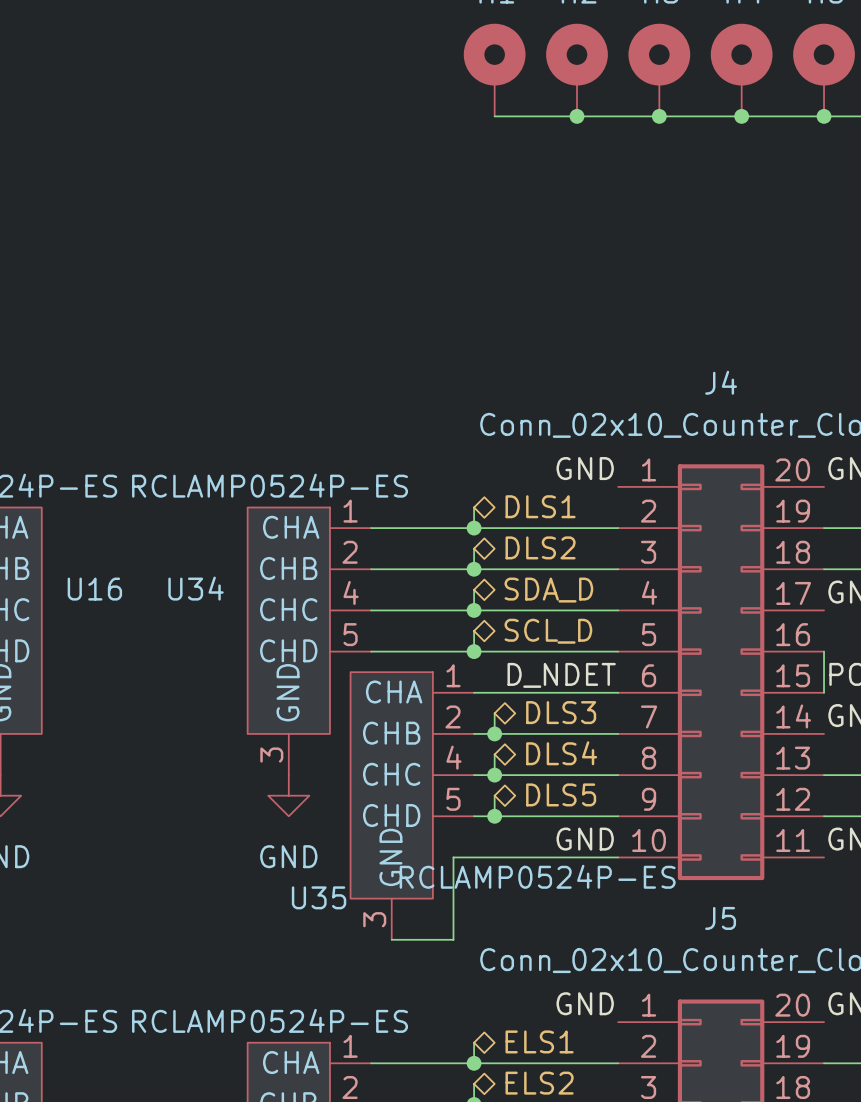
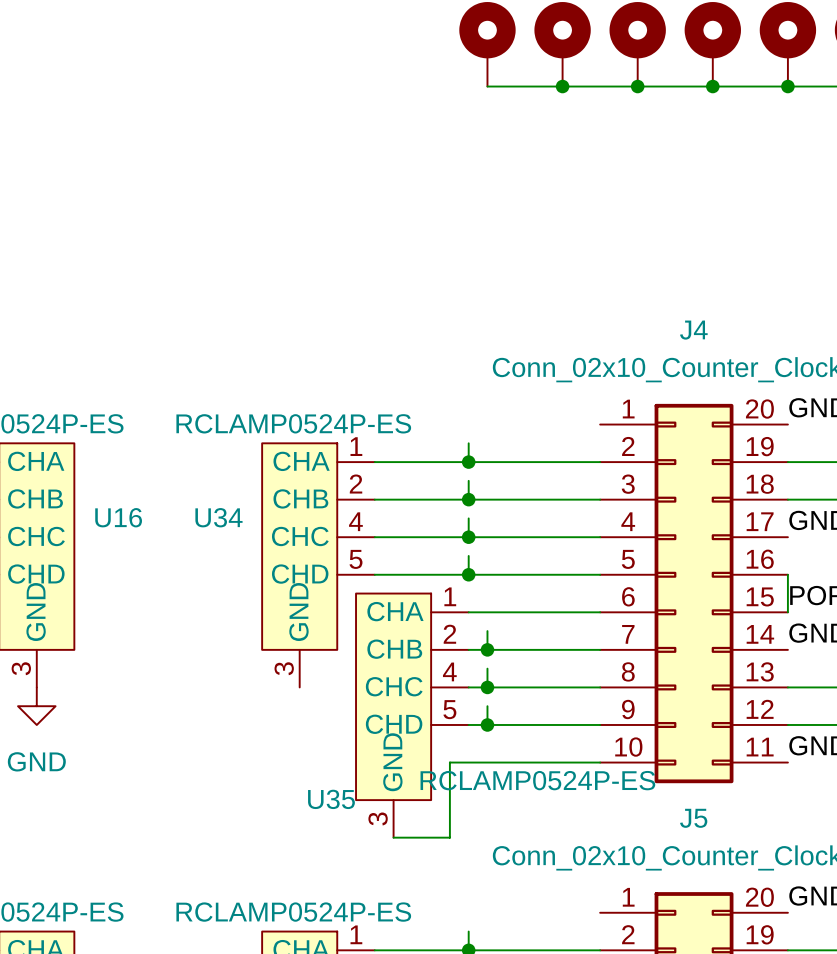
label: GND (585, 468) -> none
hierarchical label: DLS1 (540, 506) -> none
hierarchical label: DLS2 (540, 547) -> none
hierarchical label: SDA_D (548, 590) -> none
hierarchical label: SCL_D (548, 631) -> none
label: D_NDET (561, 675) -> none
hierarchical label: DLS3 (561, 712) -> none
hierarchical label: DLS4 (561, 753) -> none
hierarchical label: DLS5 (561, 794) -> none
power symbol: GND (288, 795) -> none
label: GND (585, 839) -> none
label: GND (585, 1003) -> none
hierarchical label: ELS1 (539, 1041) -> none

